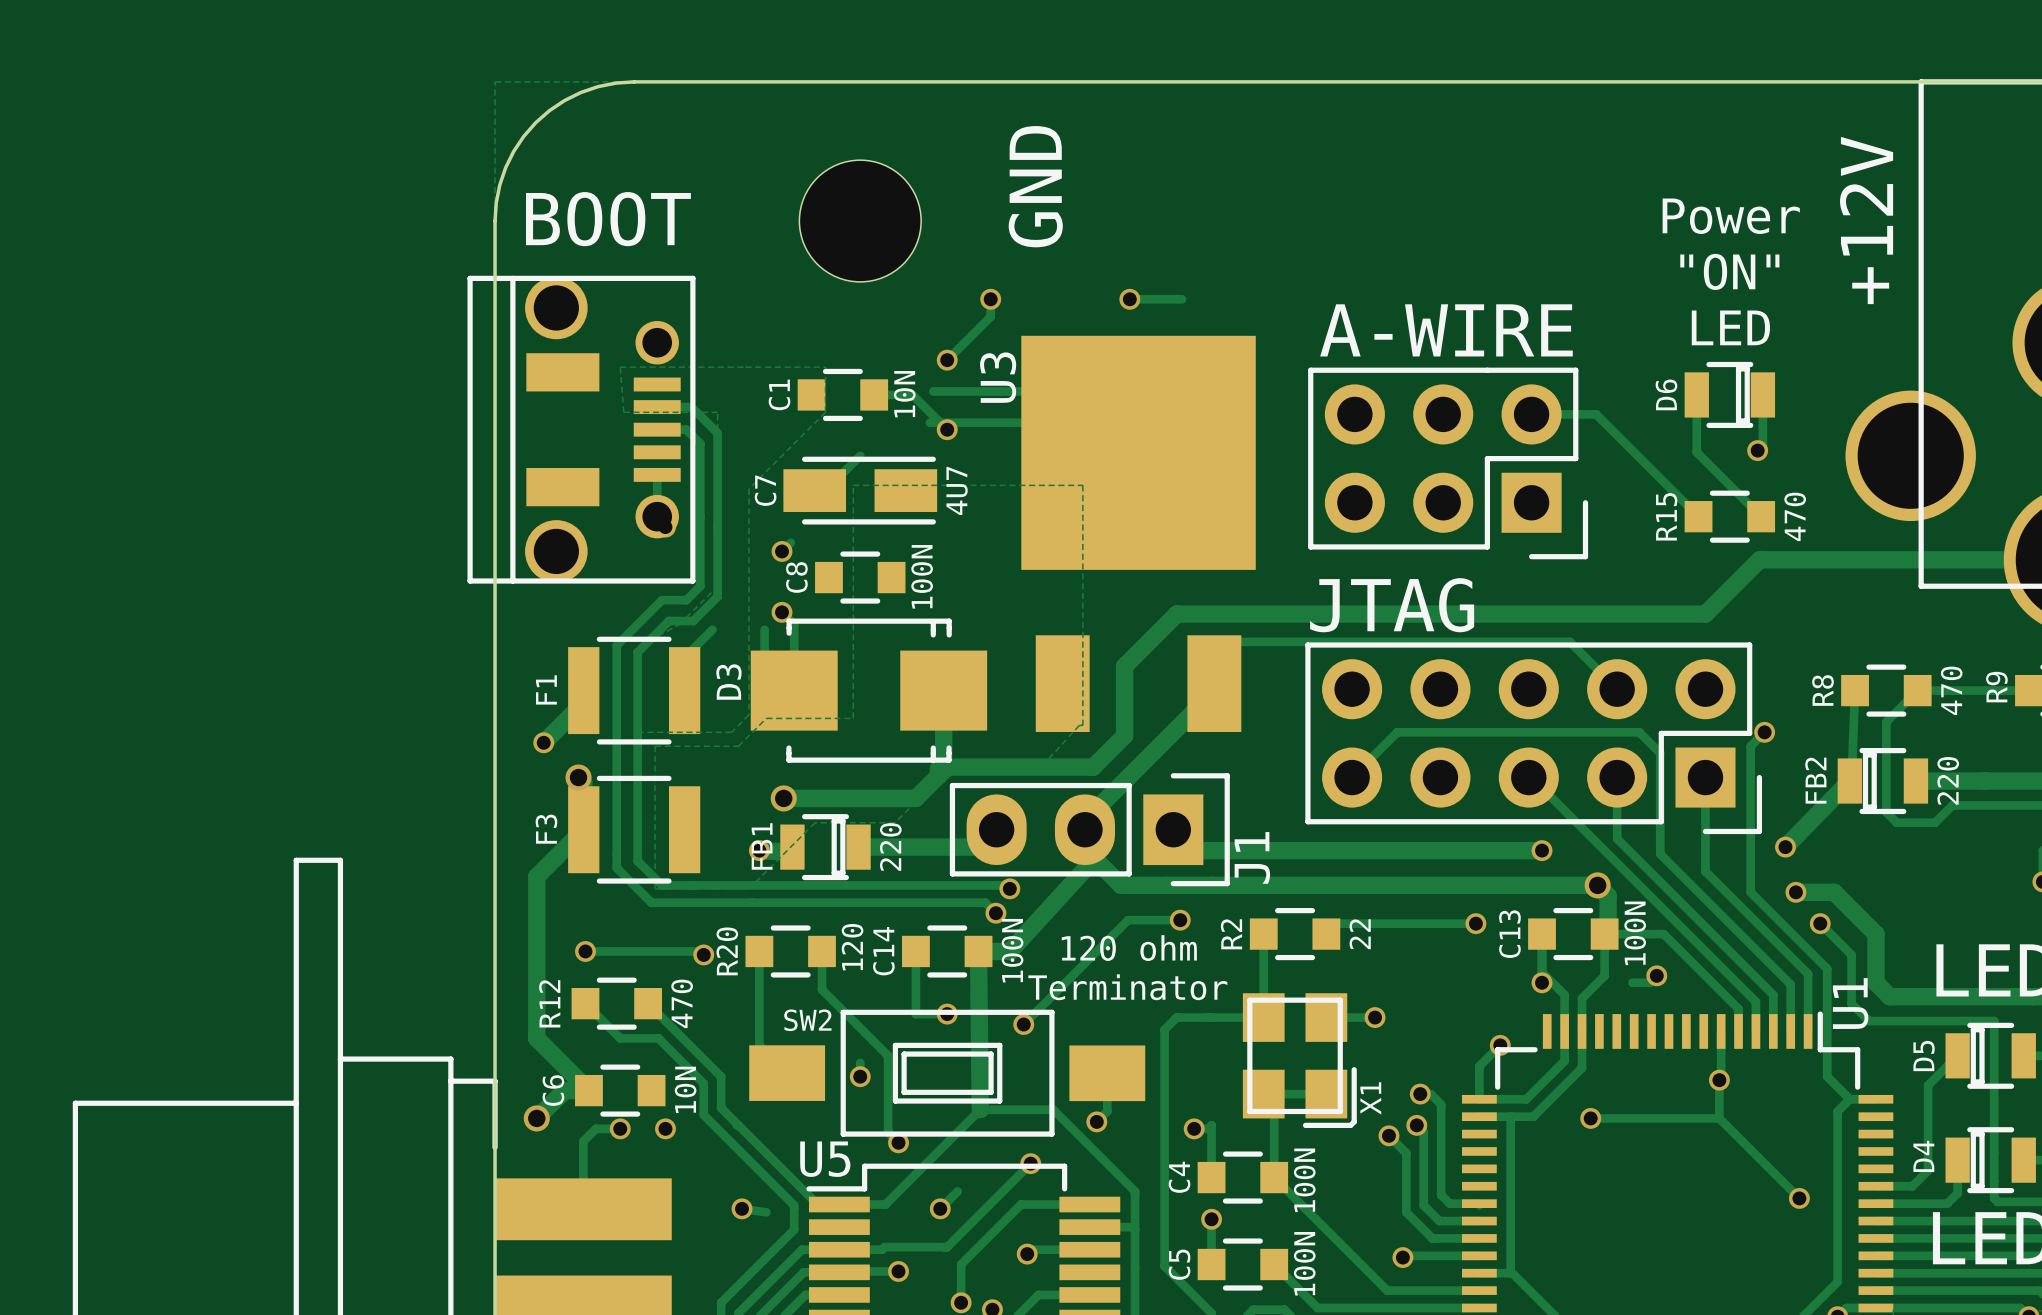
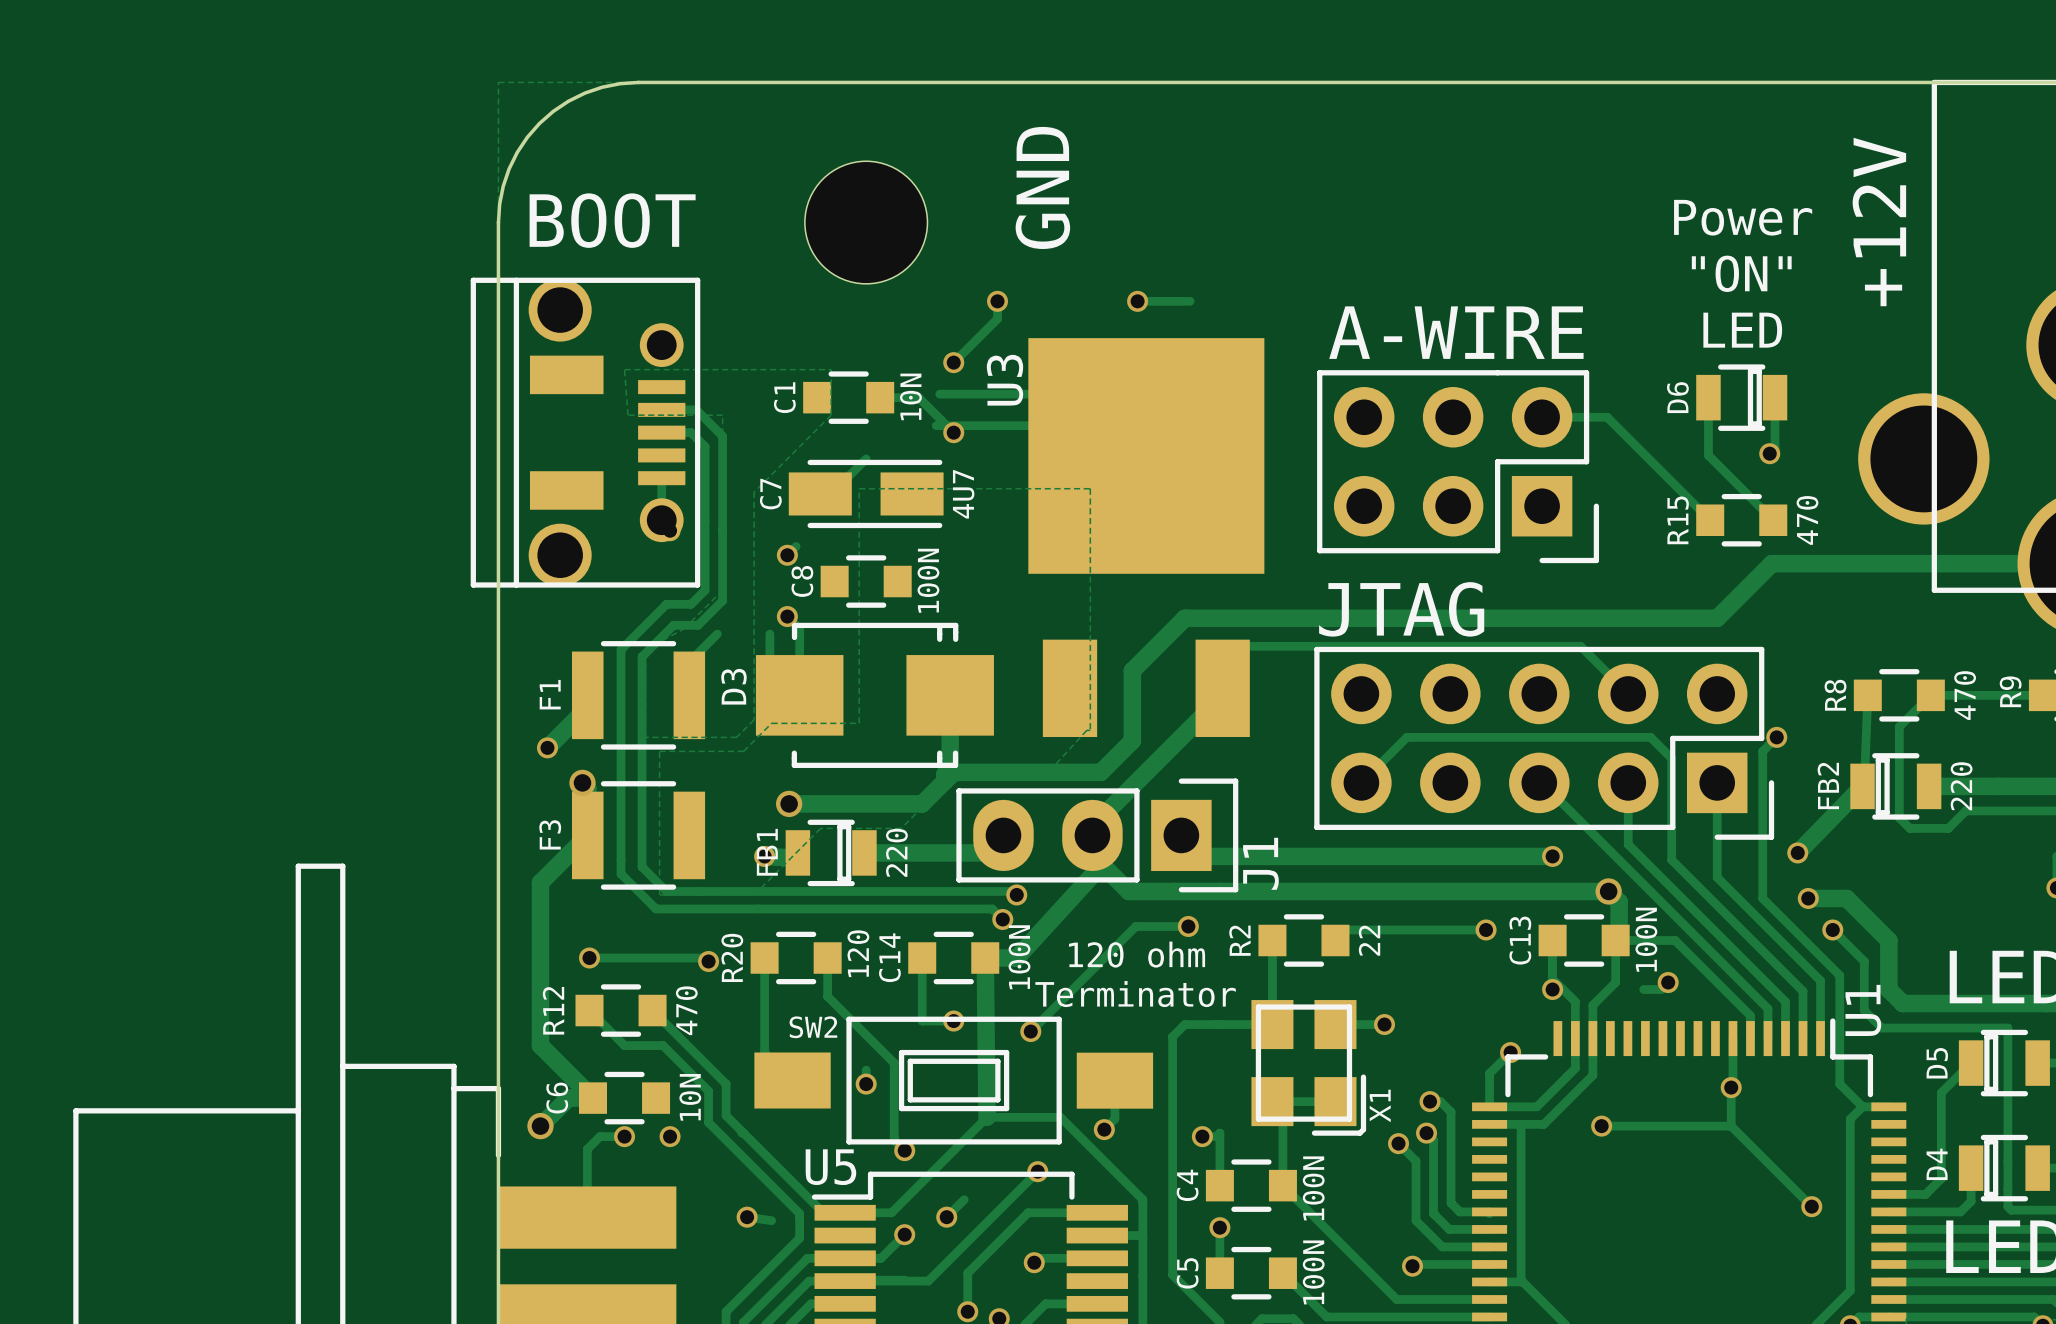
track: none -> (904, 1234) (881, 1258)
track: (947, 1247) (884, 1247) (882, 1249) (875, 1249) -> (953, 1255) (928, 1281) (845, 1281)
via position: (898, 1271) -> (904, 1234)

